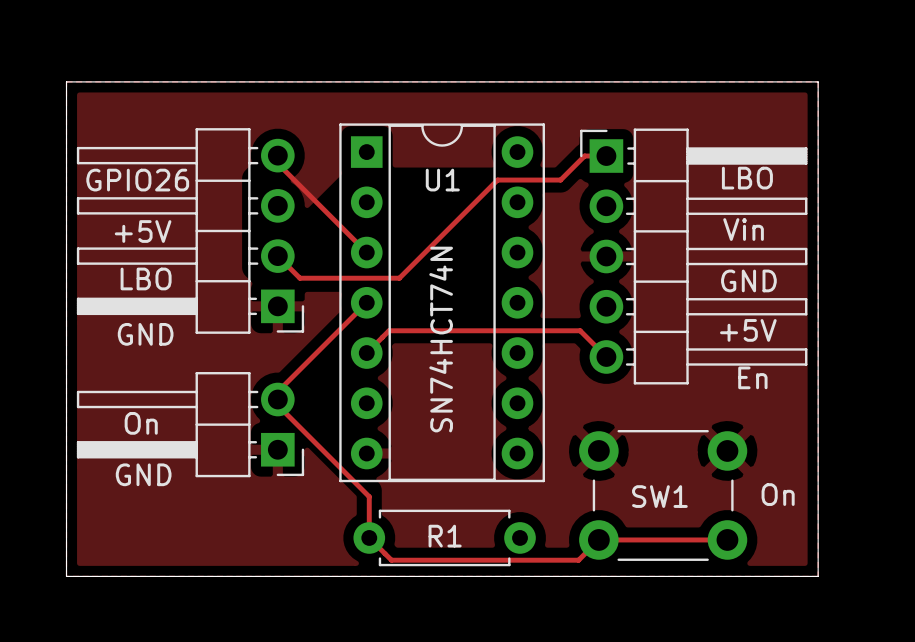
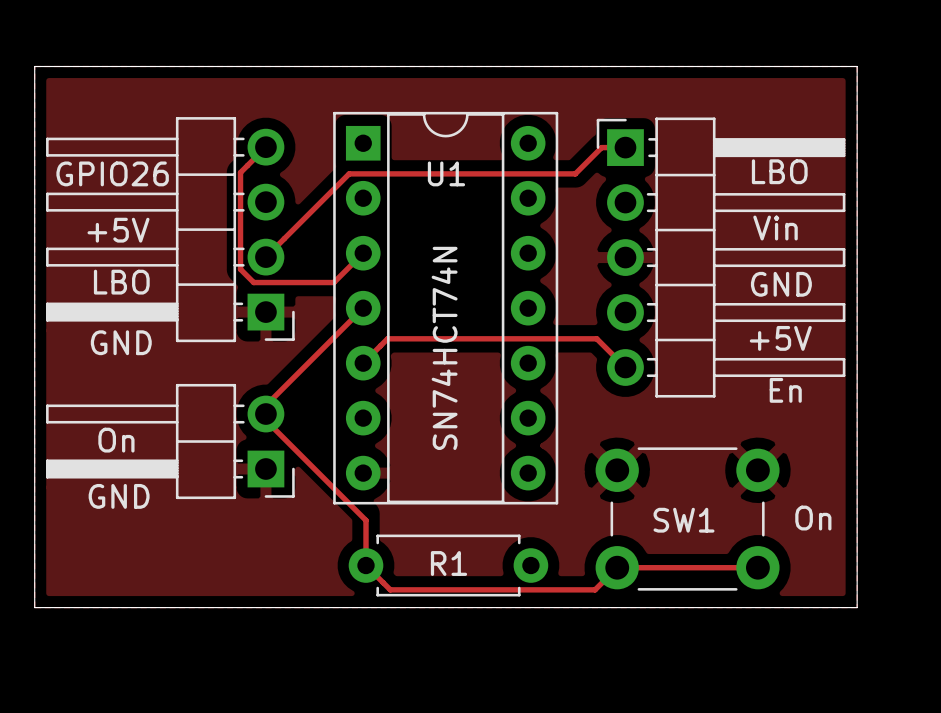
track: (277, 155) (277, 163) (366, 252) -> (265, 147) (240, 172) (240, 269) (253, 282) (333, 282) (363, 253)
track: (497, 180) (399, 278) (299, 278) (277, 256) -> (506, 173) (349, 173) (265, 257)

